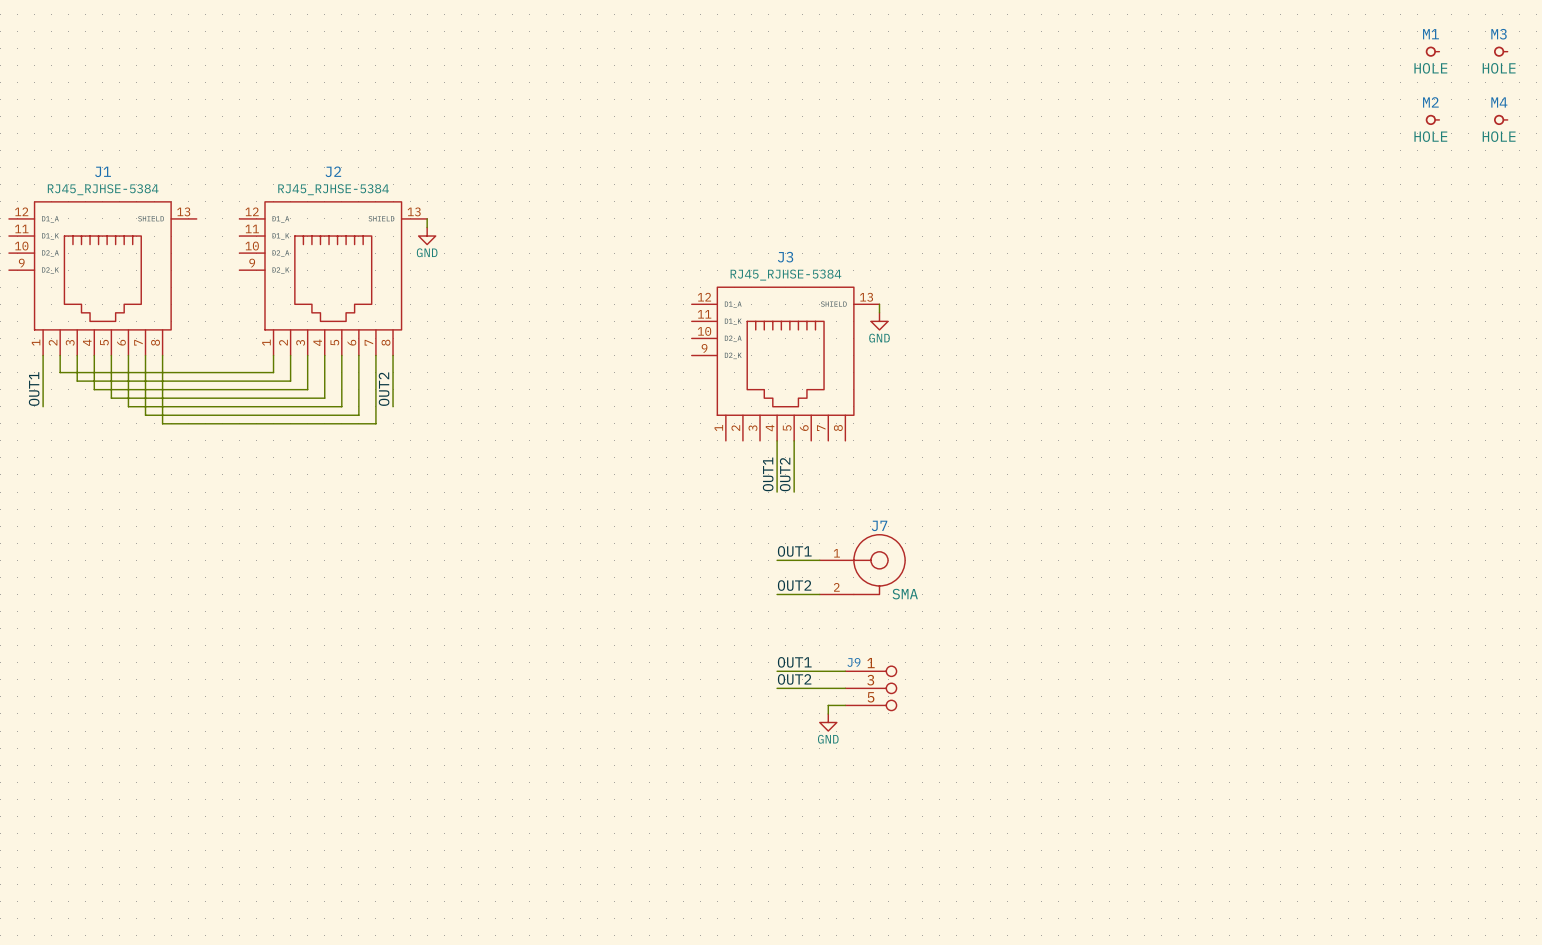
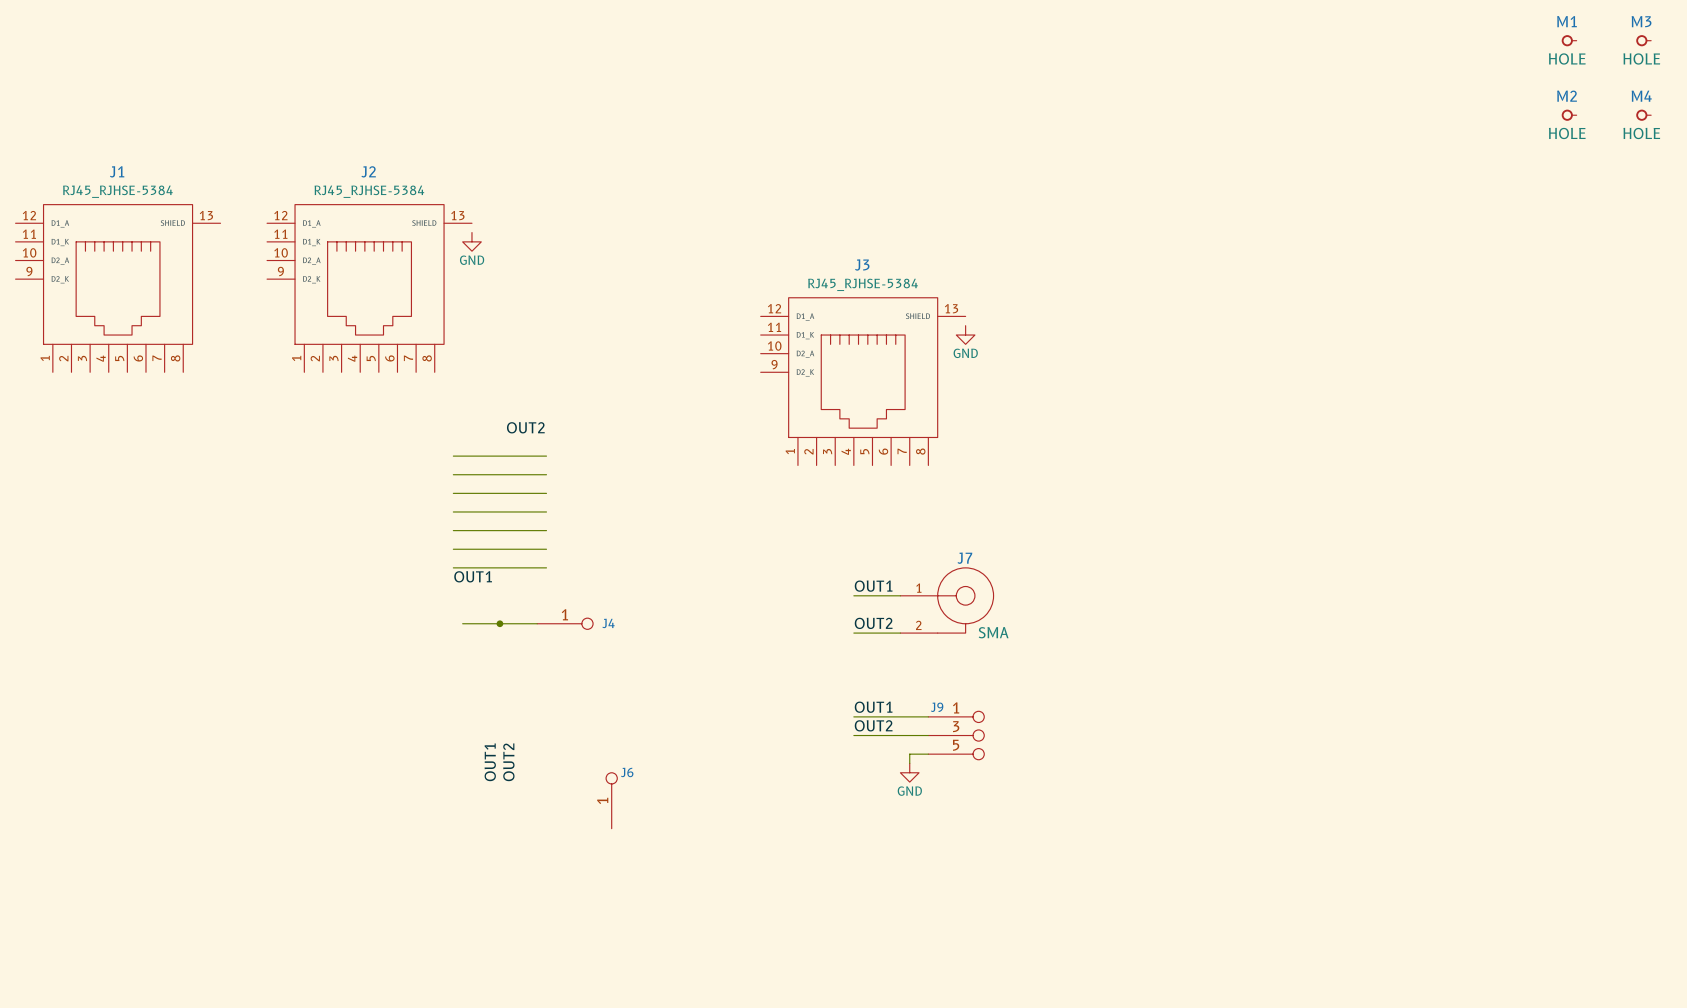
wire: (427, 218) (427, 227) -> none
wire: (879, 304) (879, 312) -> none
wire: (43, 355) (43, 406) -> none
wire: (60, 355) (60, 372) (273, 372) (273, 355) -> none
wire: (77, 355) (77, 381) (290, 381) (290, 355) -> none
wire: (94, 355) (94, 389) (307, 389) (307, 355) -> none
wire: (111, 355) (111, 398) (324, 398) (324, 355) -> none
wire: (128, 355) (128, 406) (341, 406) (341, 355) -> none
wire: (145, 355) (145, 415) (358, 415) (358, 355) -> none
wire: (162, 355) (162, 423) (375, 423) (375, 355) -> none
wire: (393, 355) (393, 406) -> none
label: OUT1 (34, 389) -> none
label rotation: 0° (384, 389) -> 90° clockwise (525, 427)
label position: OUT2 (384, 389) -> OUT2 (525, 427)
wire: none -> (453, 456) (546, 456)
wire: (777, 440) (777, 492) -> none
wire: (794, 440) (794, 492) -> none
wire: none -> (453, 474) (546, 474)
wire: none -> (453, 493) (546, 493)
label: OUT1 (768, 474) -> none
label: OUT2 (785, 474) -> none
wire: none -> (453, 511) (546, 511)
wire: none -> (453, 530) (546, 530)
wire: none -> (453, 549) (546, 549)
wire: none -> (453, 567) (546, 567)
label: none -> OUT1 (473, 576)
wire: none -> (462, 623) (537, 623)
junction: none -> (499, 623)
J4: none -> (565, 623)
label: none -> OUT1 (490, 762)
label: none -> OUT2 (508, 762)
J6: none -> (611, 800)

